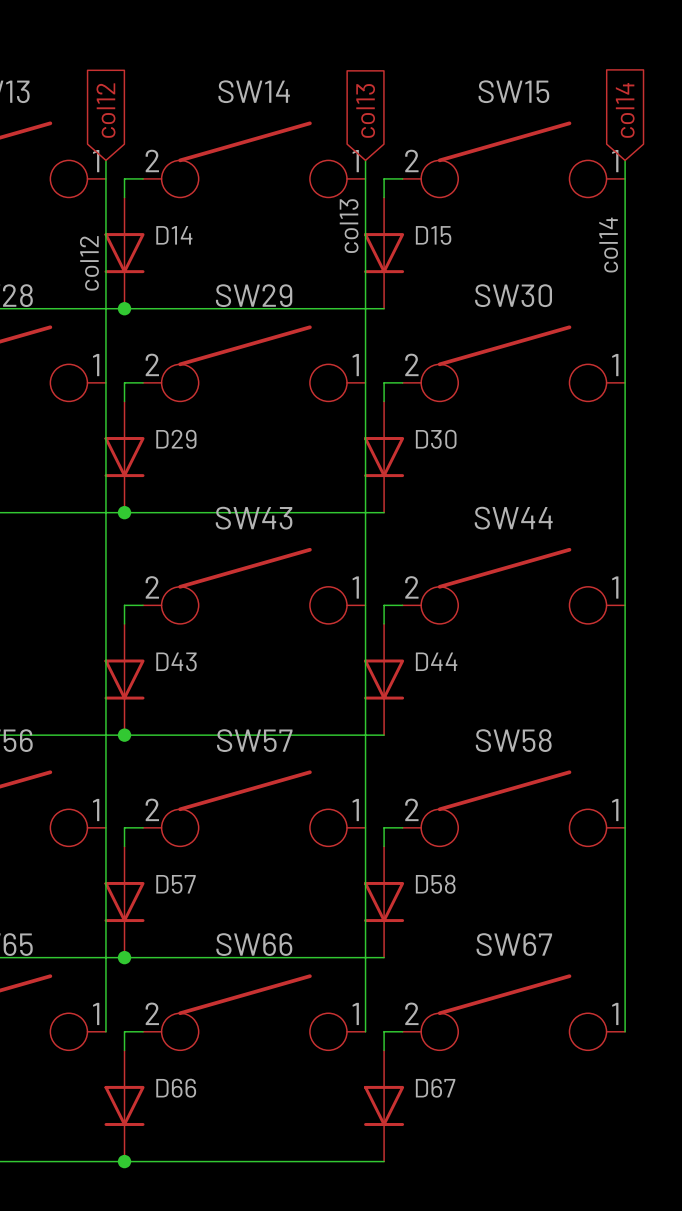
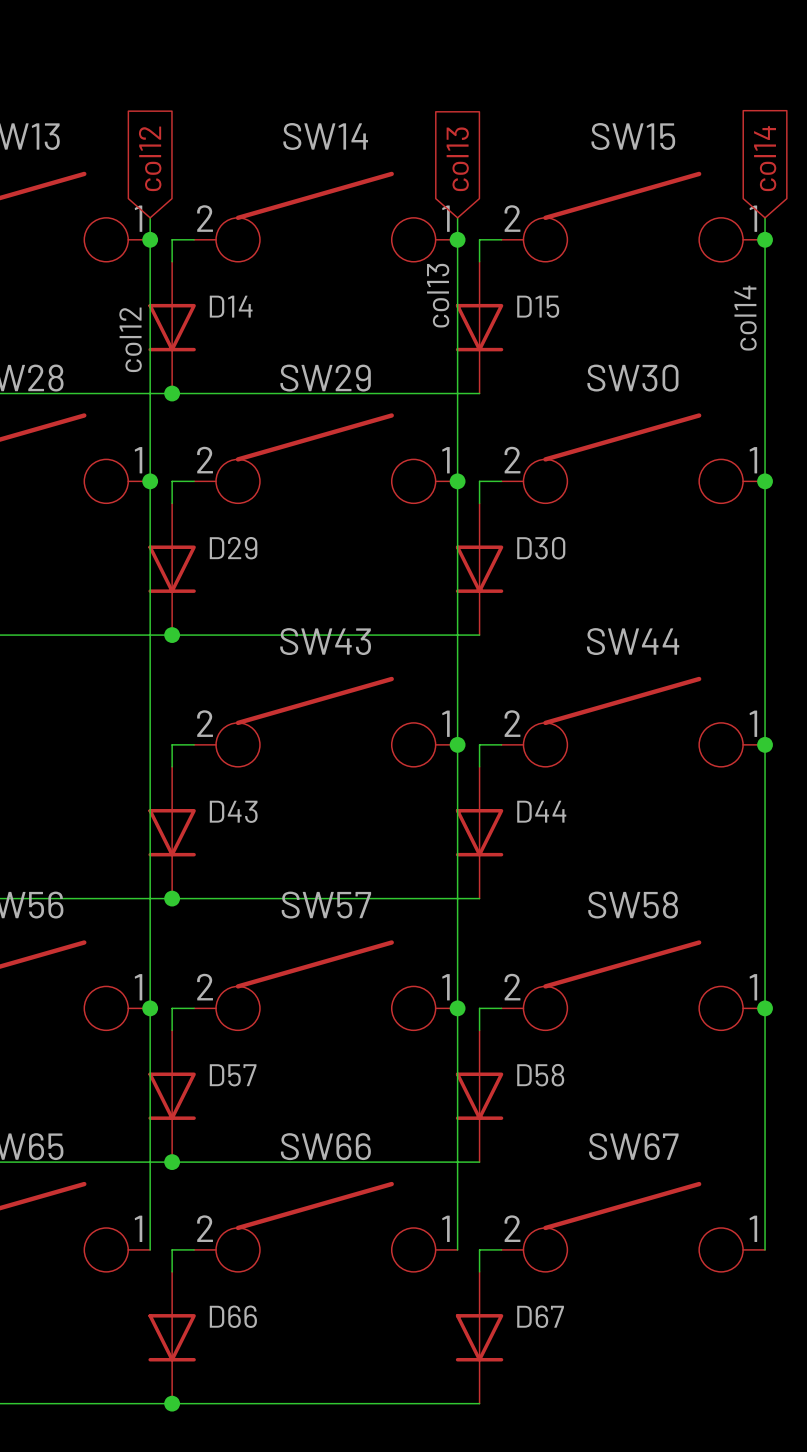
junction: none -> (150, 239)
junction: none -> (457, 239)
junction: none -> (765, 239)
junction: none -> (150, 481)
junction: none -> (457, 481)
junction: none -> (765, 481)
junction: none -> (457, 744)
junction: none -> (765, 744)
junction: none -> (150, 1008)
junction: none -> (457, 1008)
junction: none -> (765, 1008)

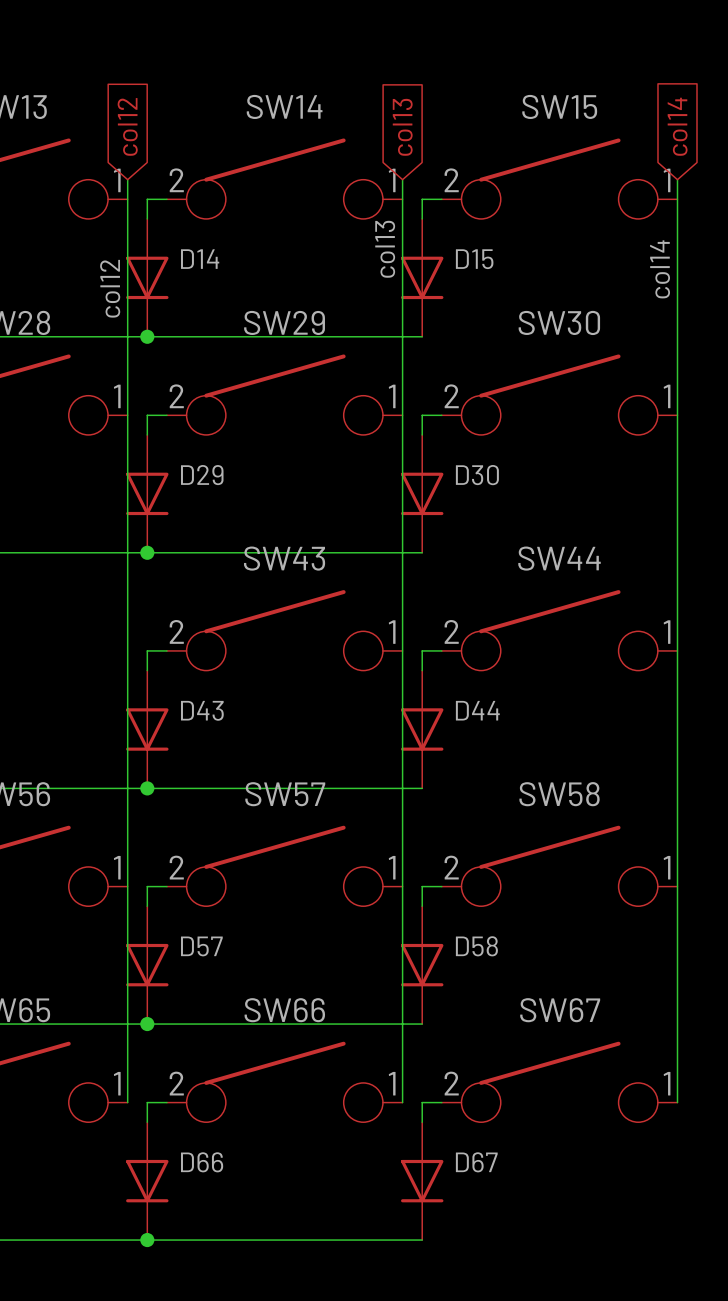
junction: (150, 239) -> none
junction: (457, 239) -> none
junction: (765, 239) -> none
junction: (150, 481) -> none
junction: (457, 481) -> none
junction: (765, 481) -> none
junction: (457, 744) -> none
junction: (765, 744) -> none
junction: (150, 1008) -> none
junction: (457, 1008) -> none
junction: (765, 1008) -> none

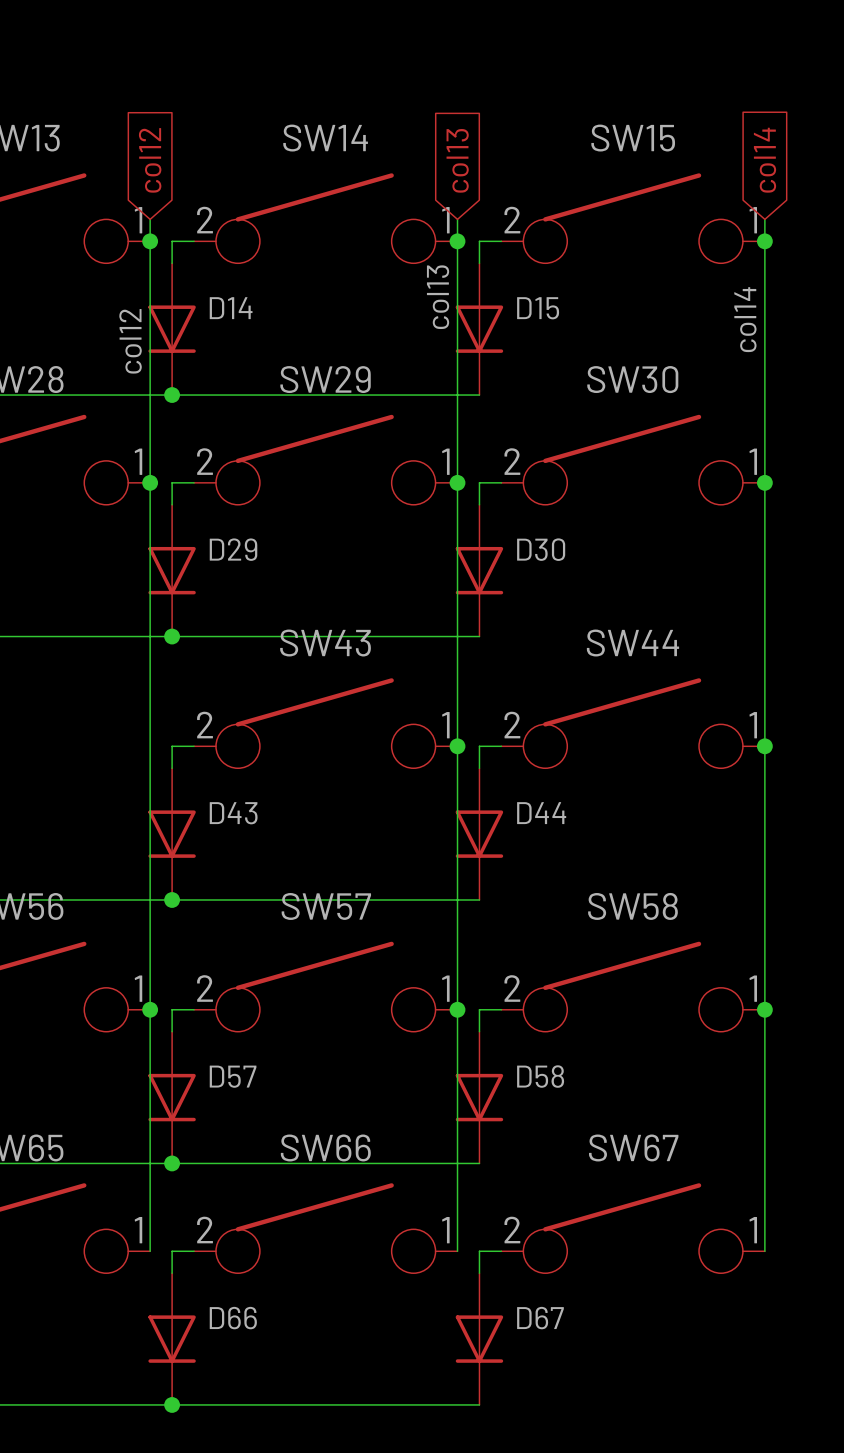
junction: none -> (150, 241)
junction: none -> (457, 241)
junction: none -> (764, 241)
junction: none -> (150, 482)
junction: none -> (457, 482)
junction: none -> (764, 482)
junction: none -> (457, 746)
junction: none -> (764, 746)
junction: none -> (150, 1009)
junction: none -> (457, 1009)
junction: none -> (764, 1009)

